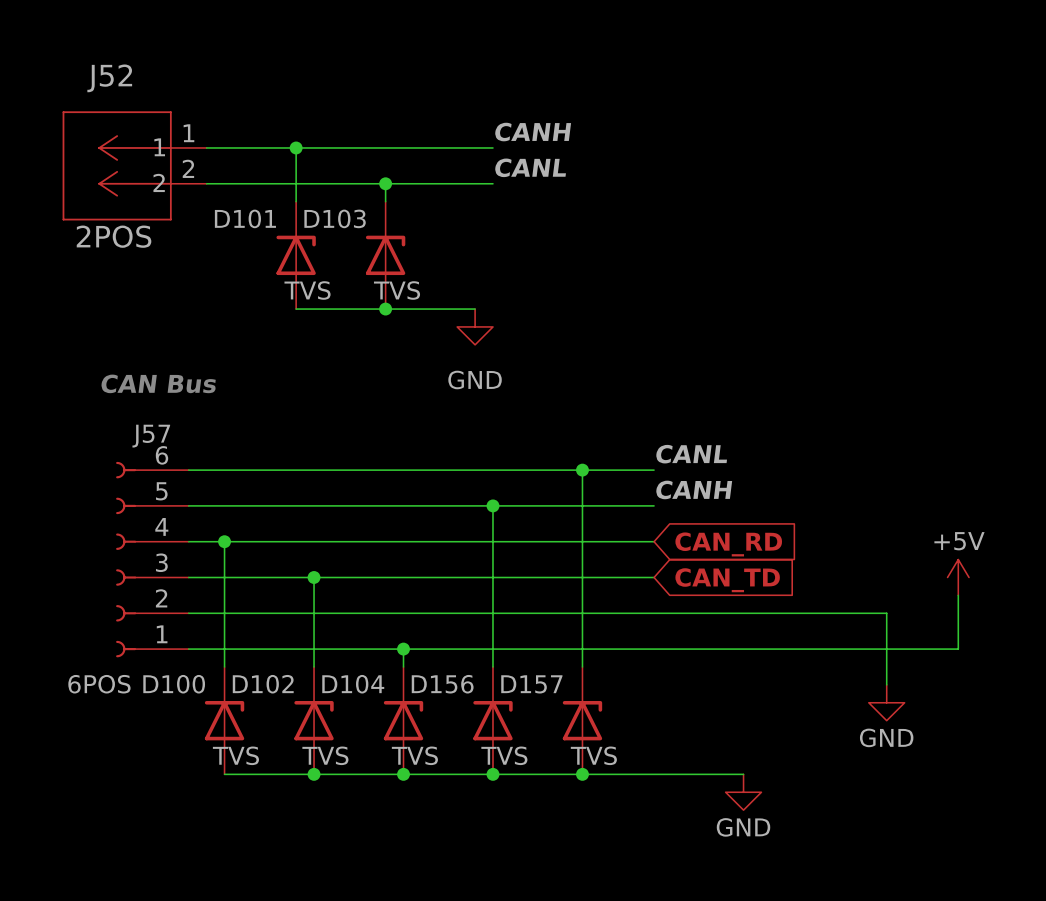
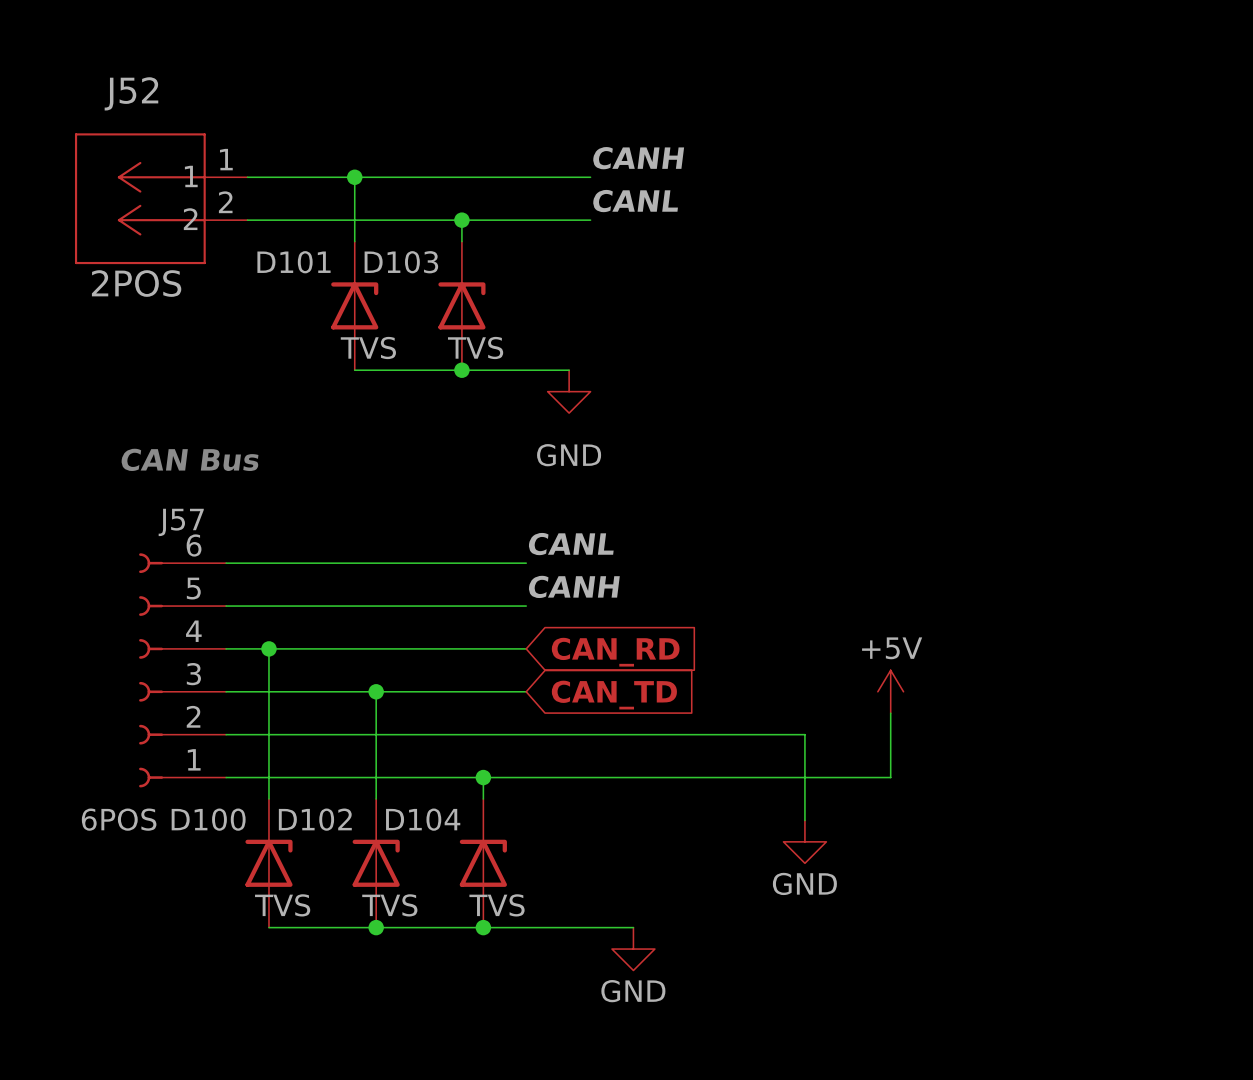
label position: CANL (691, 454) -> CANL (571, 544)
wire: (439, 470) (654, 470) -> none
wire: (582, 470) (582, 666) -> none
junction: (582, 470) -> none
label position: CANH (694, 489) -> CANH (574, 586)
wire: (439, 505) (654, 505) -> none
wire: (492, 505) (492, 666) -> none
junction: (492, 505) -> none
wire: (439, 541) (654, 541) -> none
global label position: CAN_RD (728, 544) -> CAN_RD (615, 652)
wire: (439, 577) (654, 577) -> none
power symbol position: +5V (958, 577) -> +5V (890, 691)
global label position: CAN_TD (727, 580) -> CAN_TD (614, 695)
wire: (958, 595) (958, 649) (743, 649) -> (890, 713) (890, 777)
wire: (671, 613) (886, 613) (886, 684) -> (804, 734) (804, 820)
power symbol: none -> GND (804, 841)
power symbol: GND (886, 702) -> none
D156: TVS (492, 720) -> none
D157: TVS (582, 720) -> none
junction: (492, 774) -> none
wire: (528, 774) (743, 774) -> none
junction: (582, 774) -> none
power symbol: none -> GND (633, 949)
power symbol: GND (743, 792) -> none

